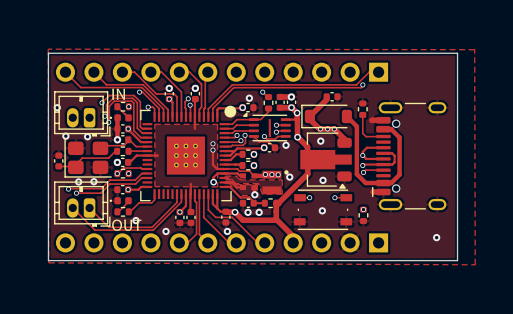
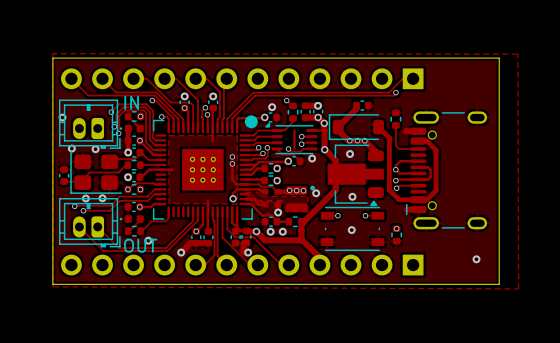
part: none -> (235, 237)
track: none -> (208, 243) (190, 243) (181, 252)
track: none -> (243, 243) (243, 252)

